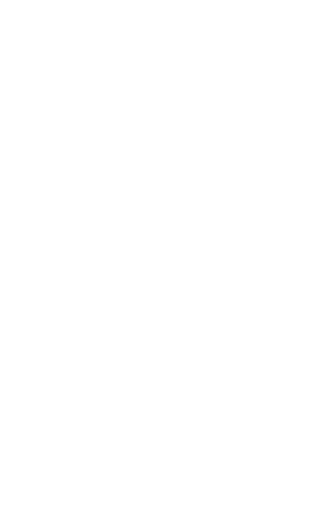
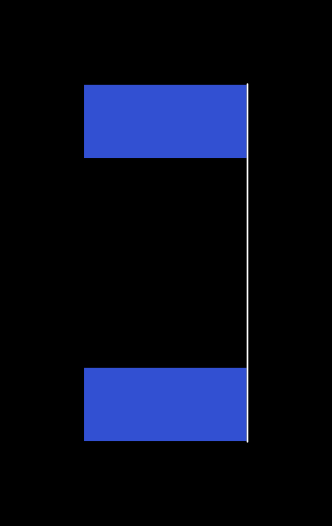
part: none -> (165, 262)

